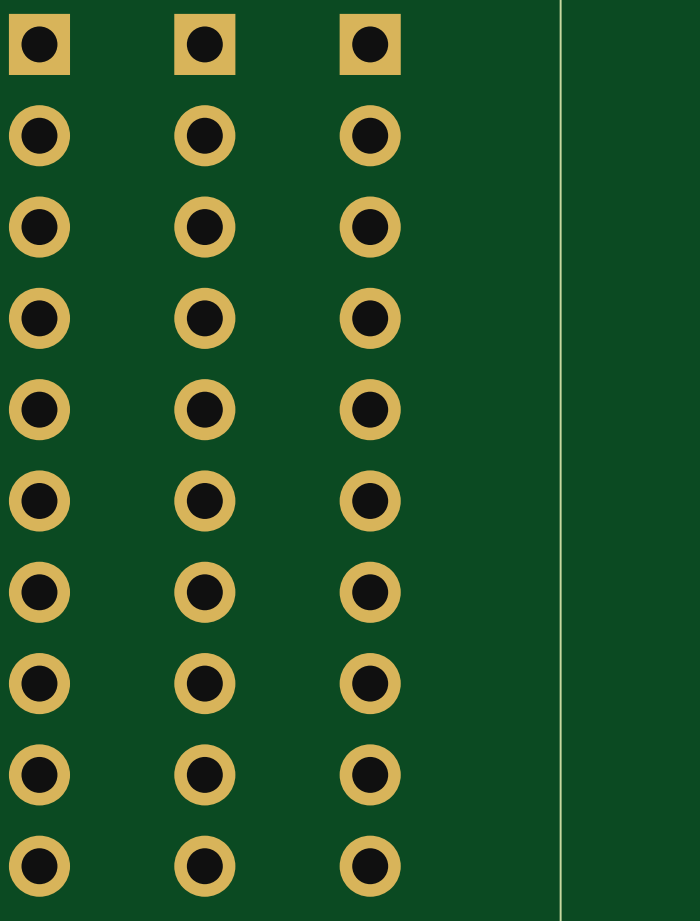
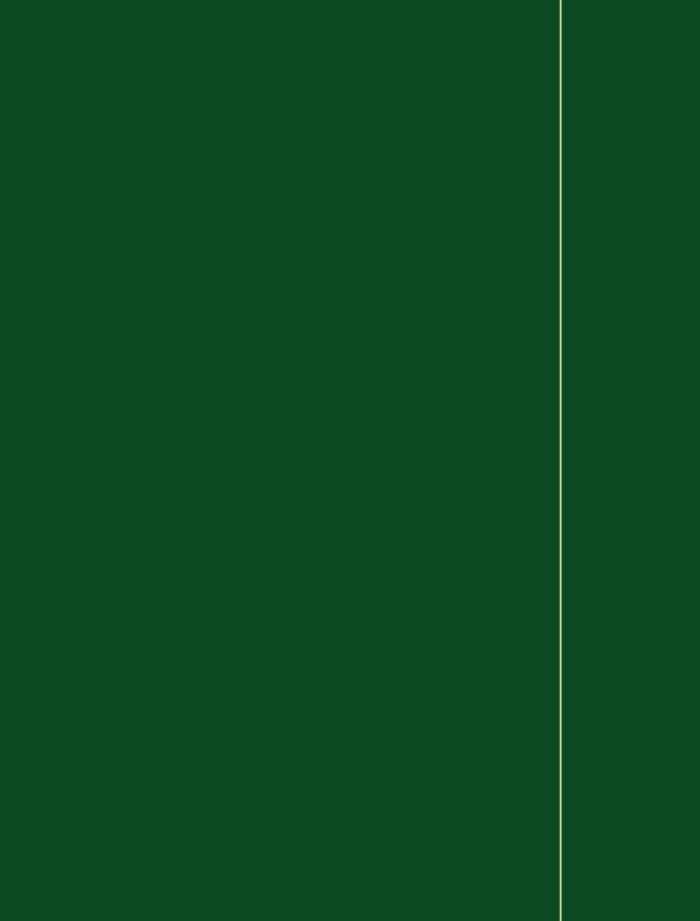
part: (39, 455) -> none
part: (204, 455) -> none
part: (370, 455) -> none

